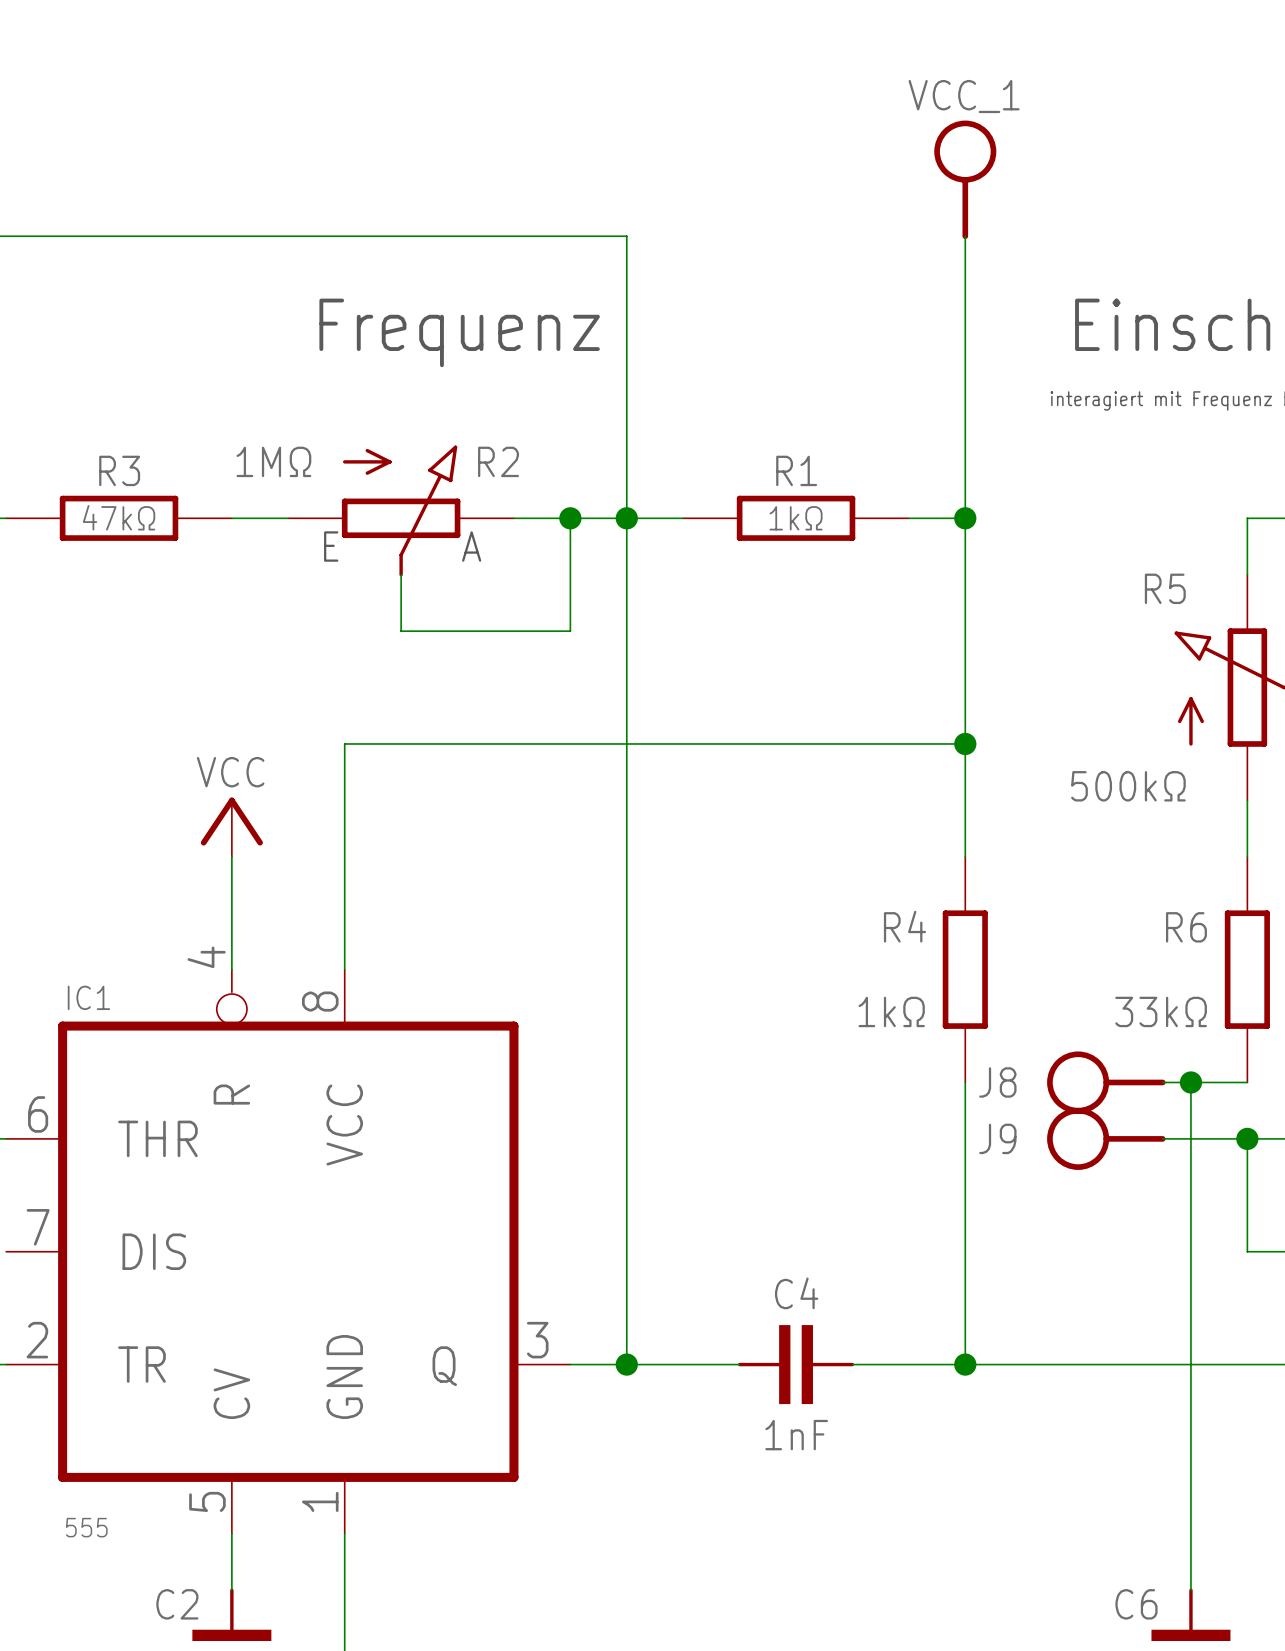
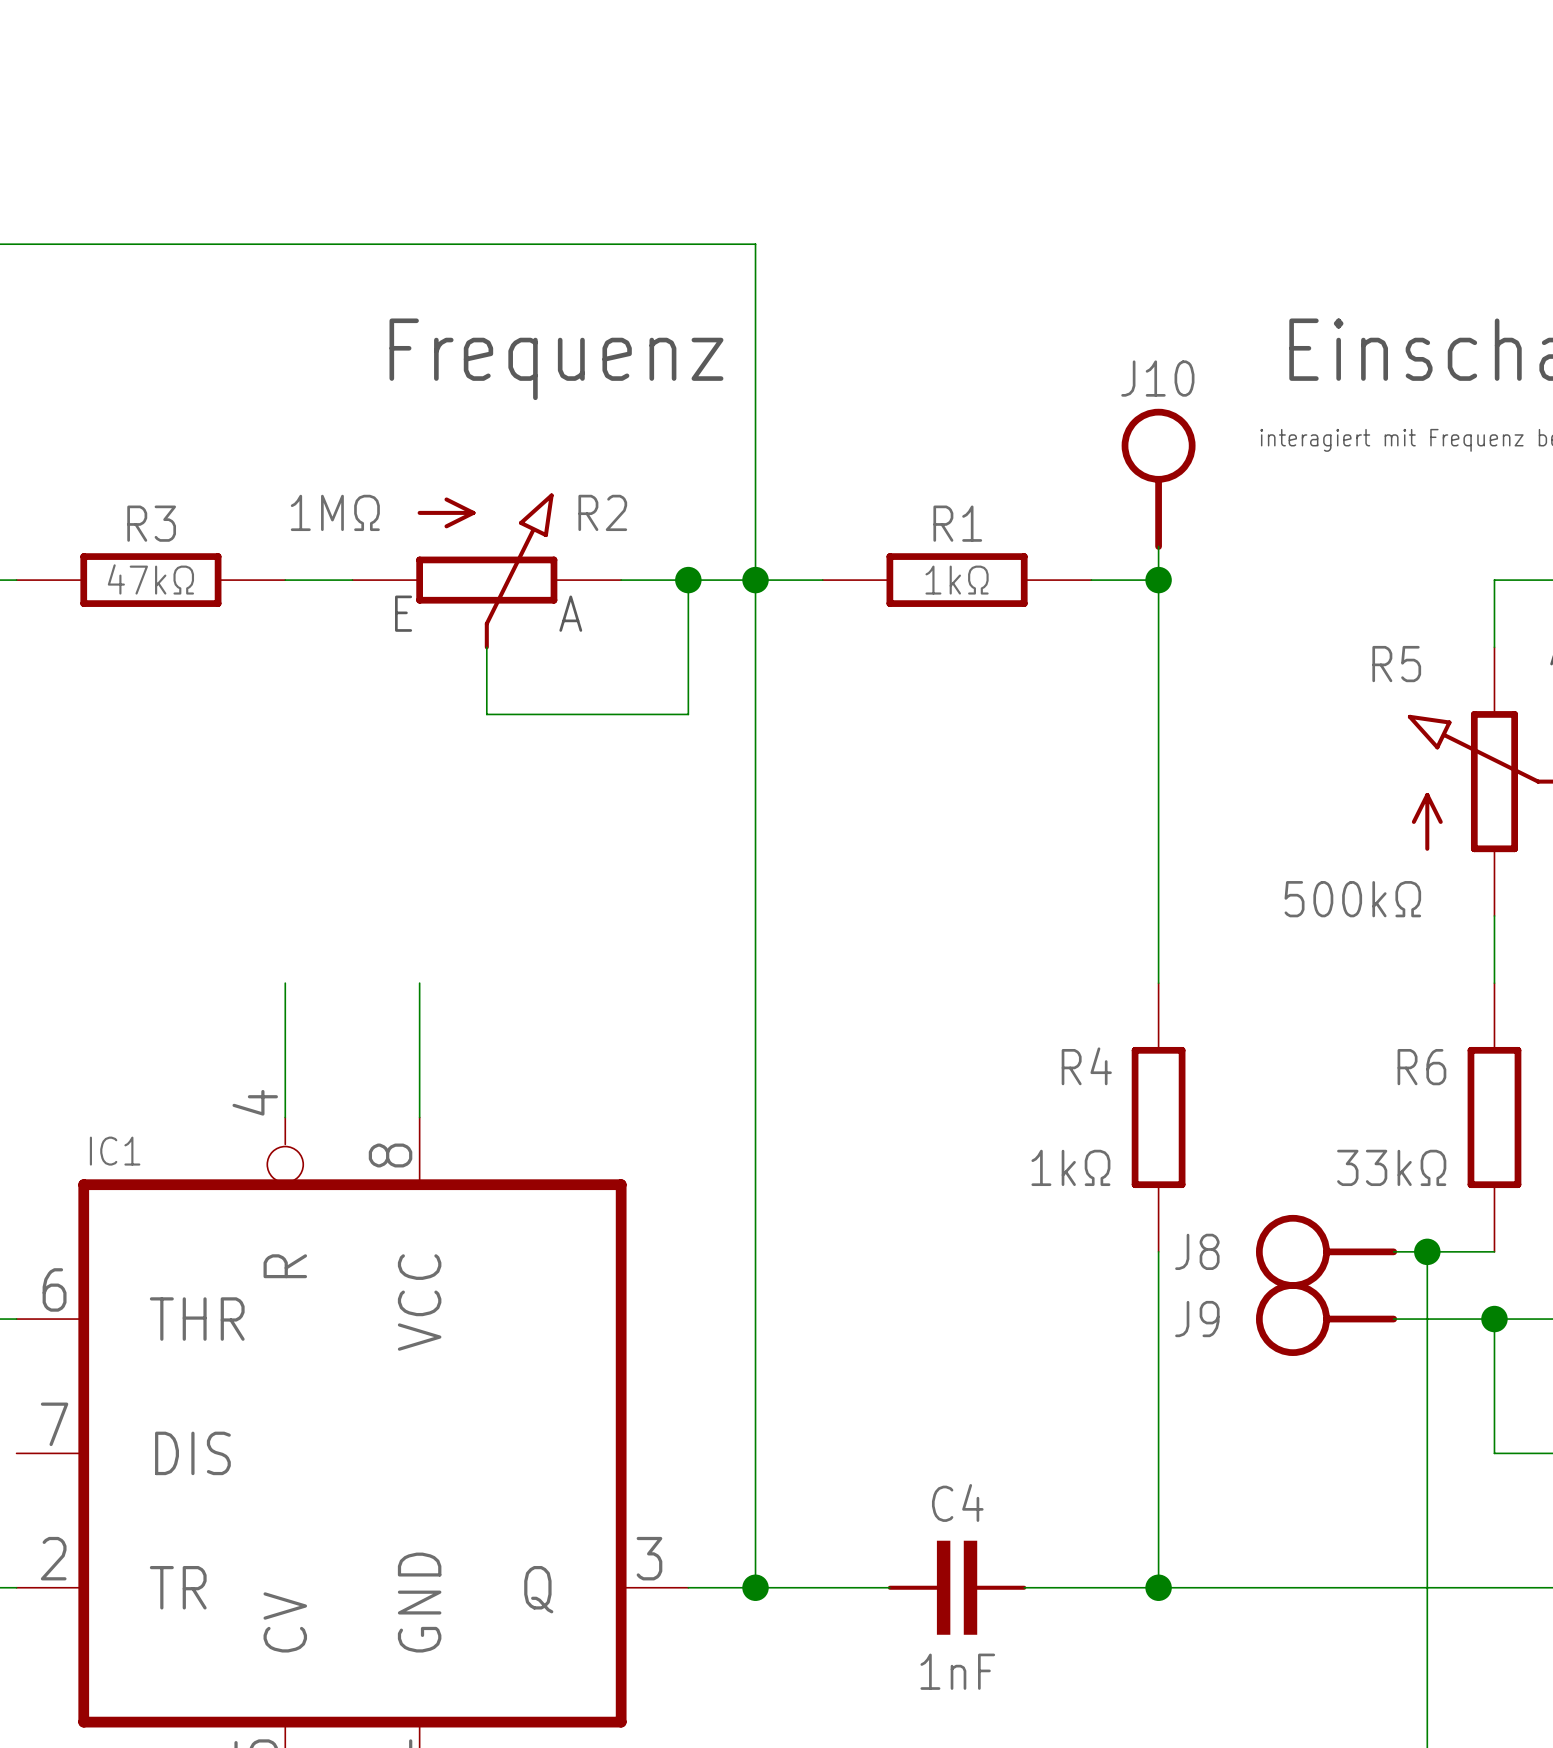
VCC_1: (965, 179) -> none
wire: (965, 236) (965, 490) -> none
J10: none -> (1158, 479)
wire: (965, 743) (344, 743) (344, 856) -> none
junction: (965, 743) -> none
power symbol: VCC (231, 827) -> none

